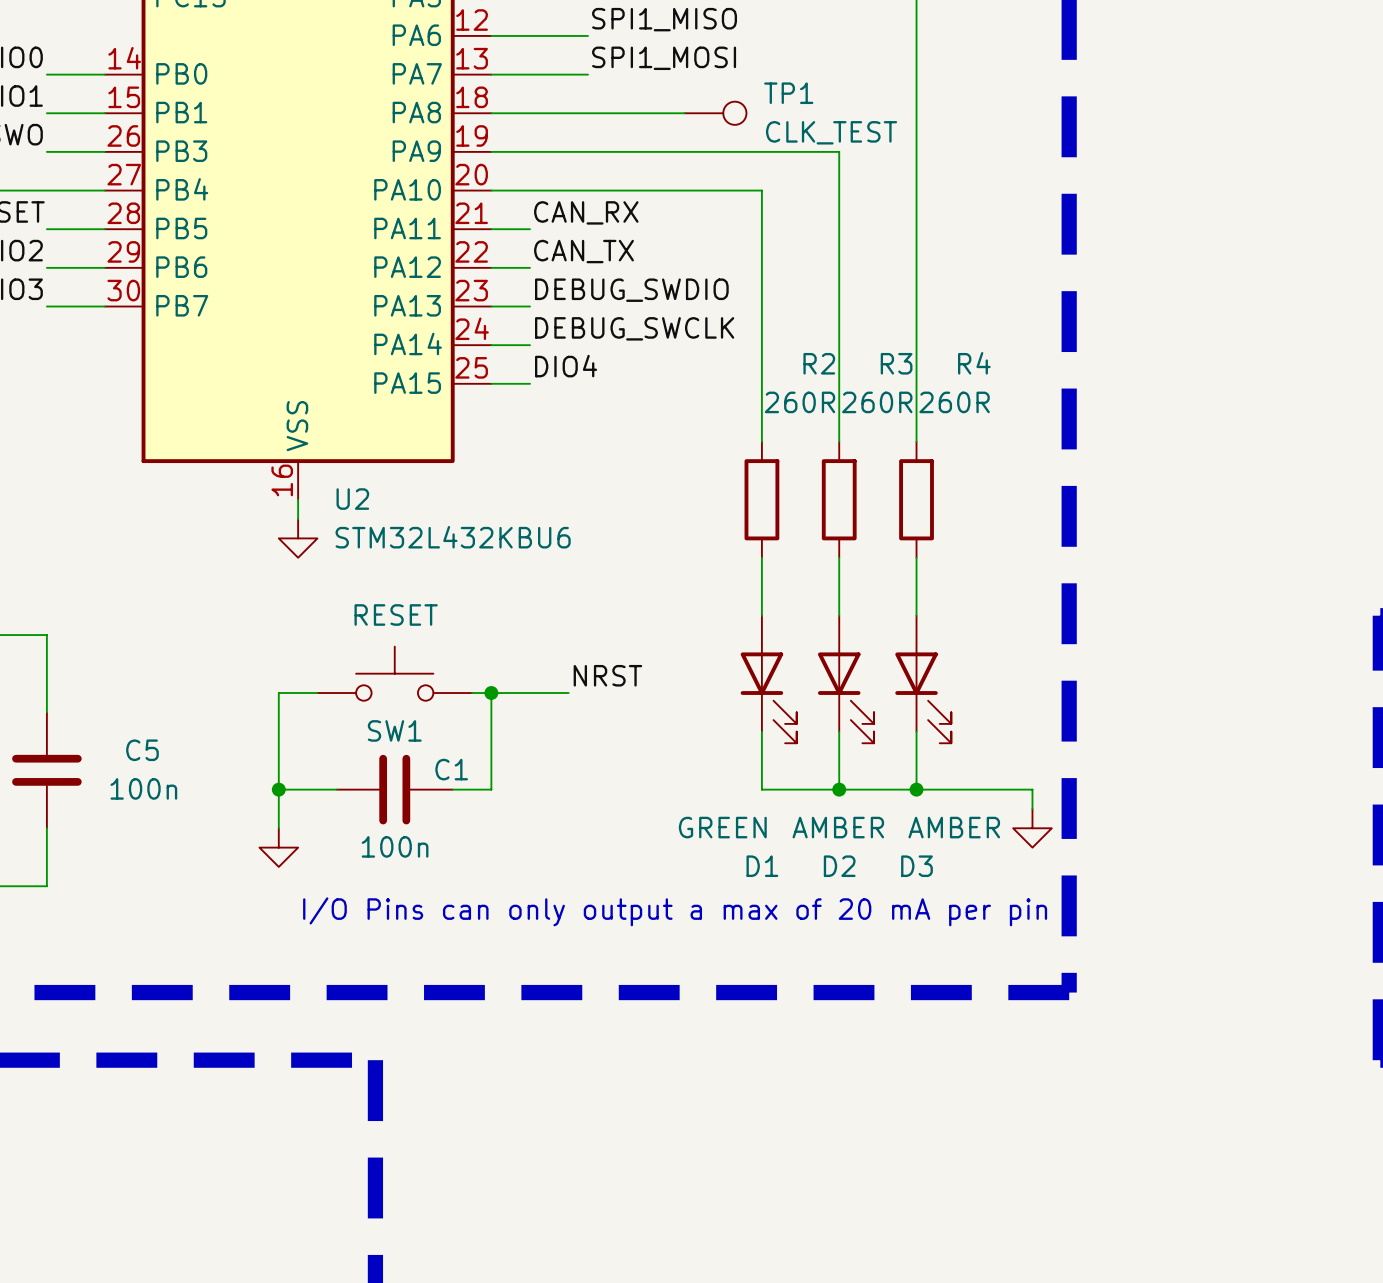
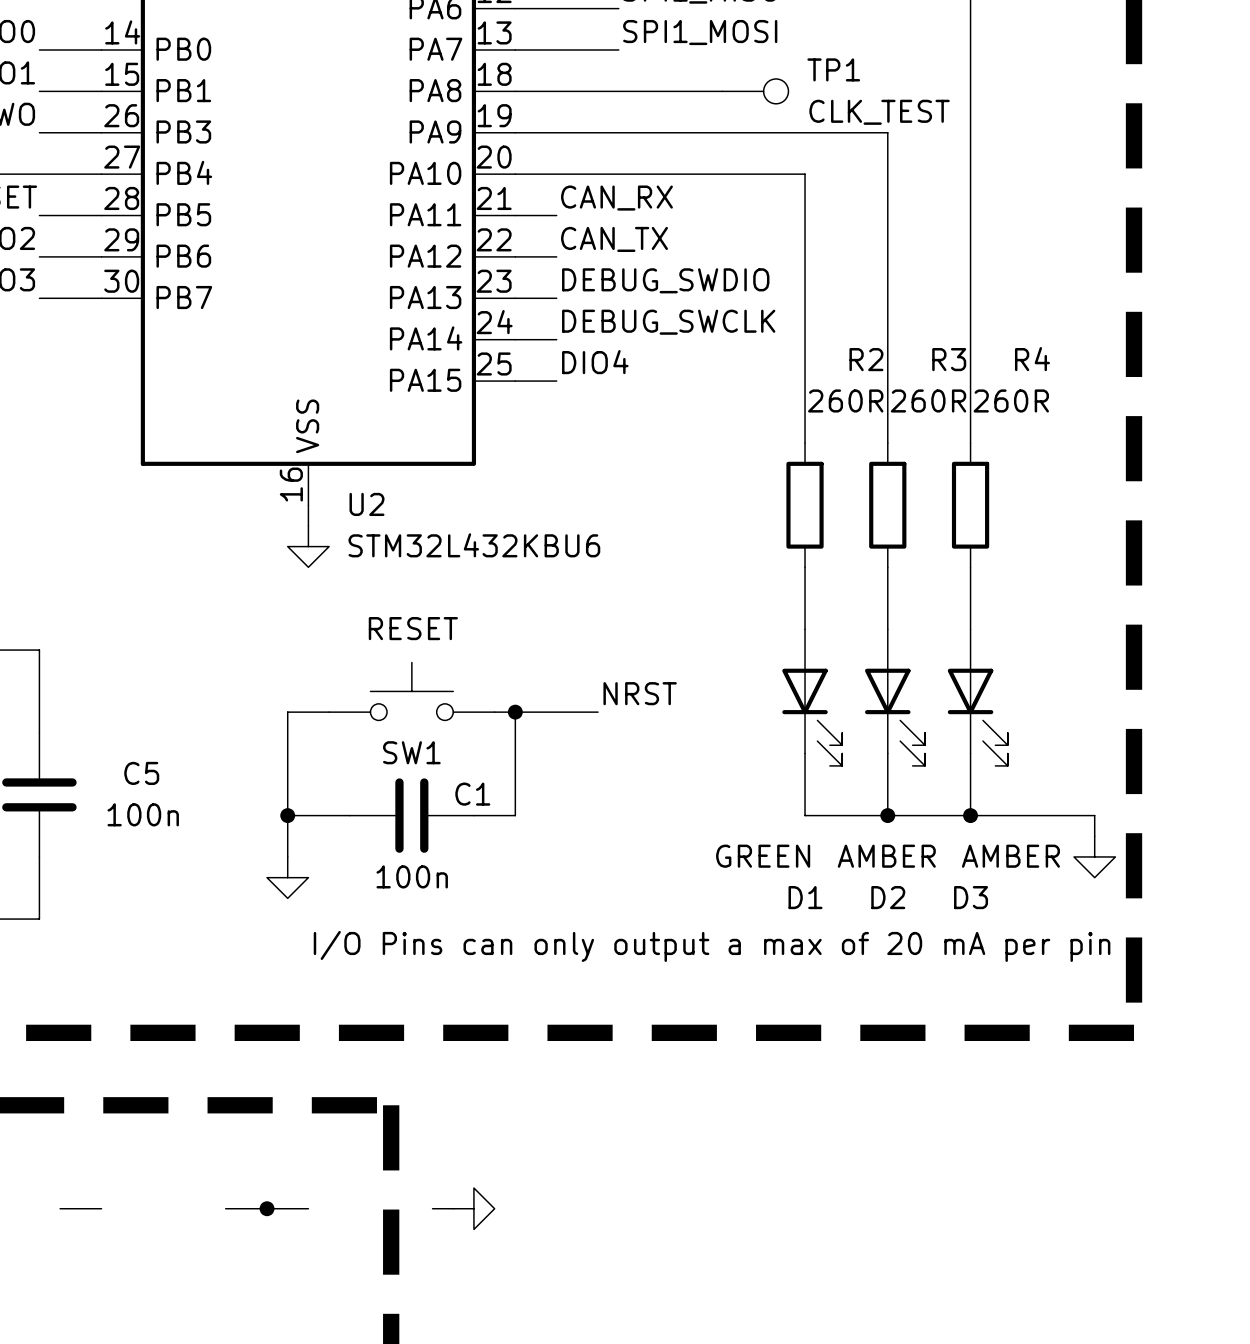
wire: none -> (60, 1208) (101, 1208)
wire: none -> (225, 1208) (308, 1208)
junction: none -> (267, 1208)
wire: none -> (432, 1208) (453, 1208)
power symbol: none -> (473, 1208)

